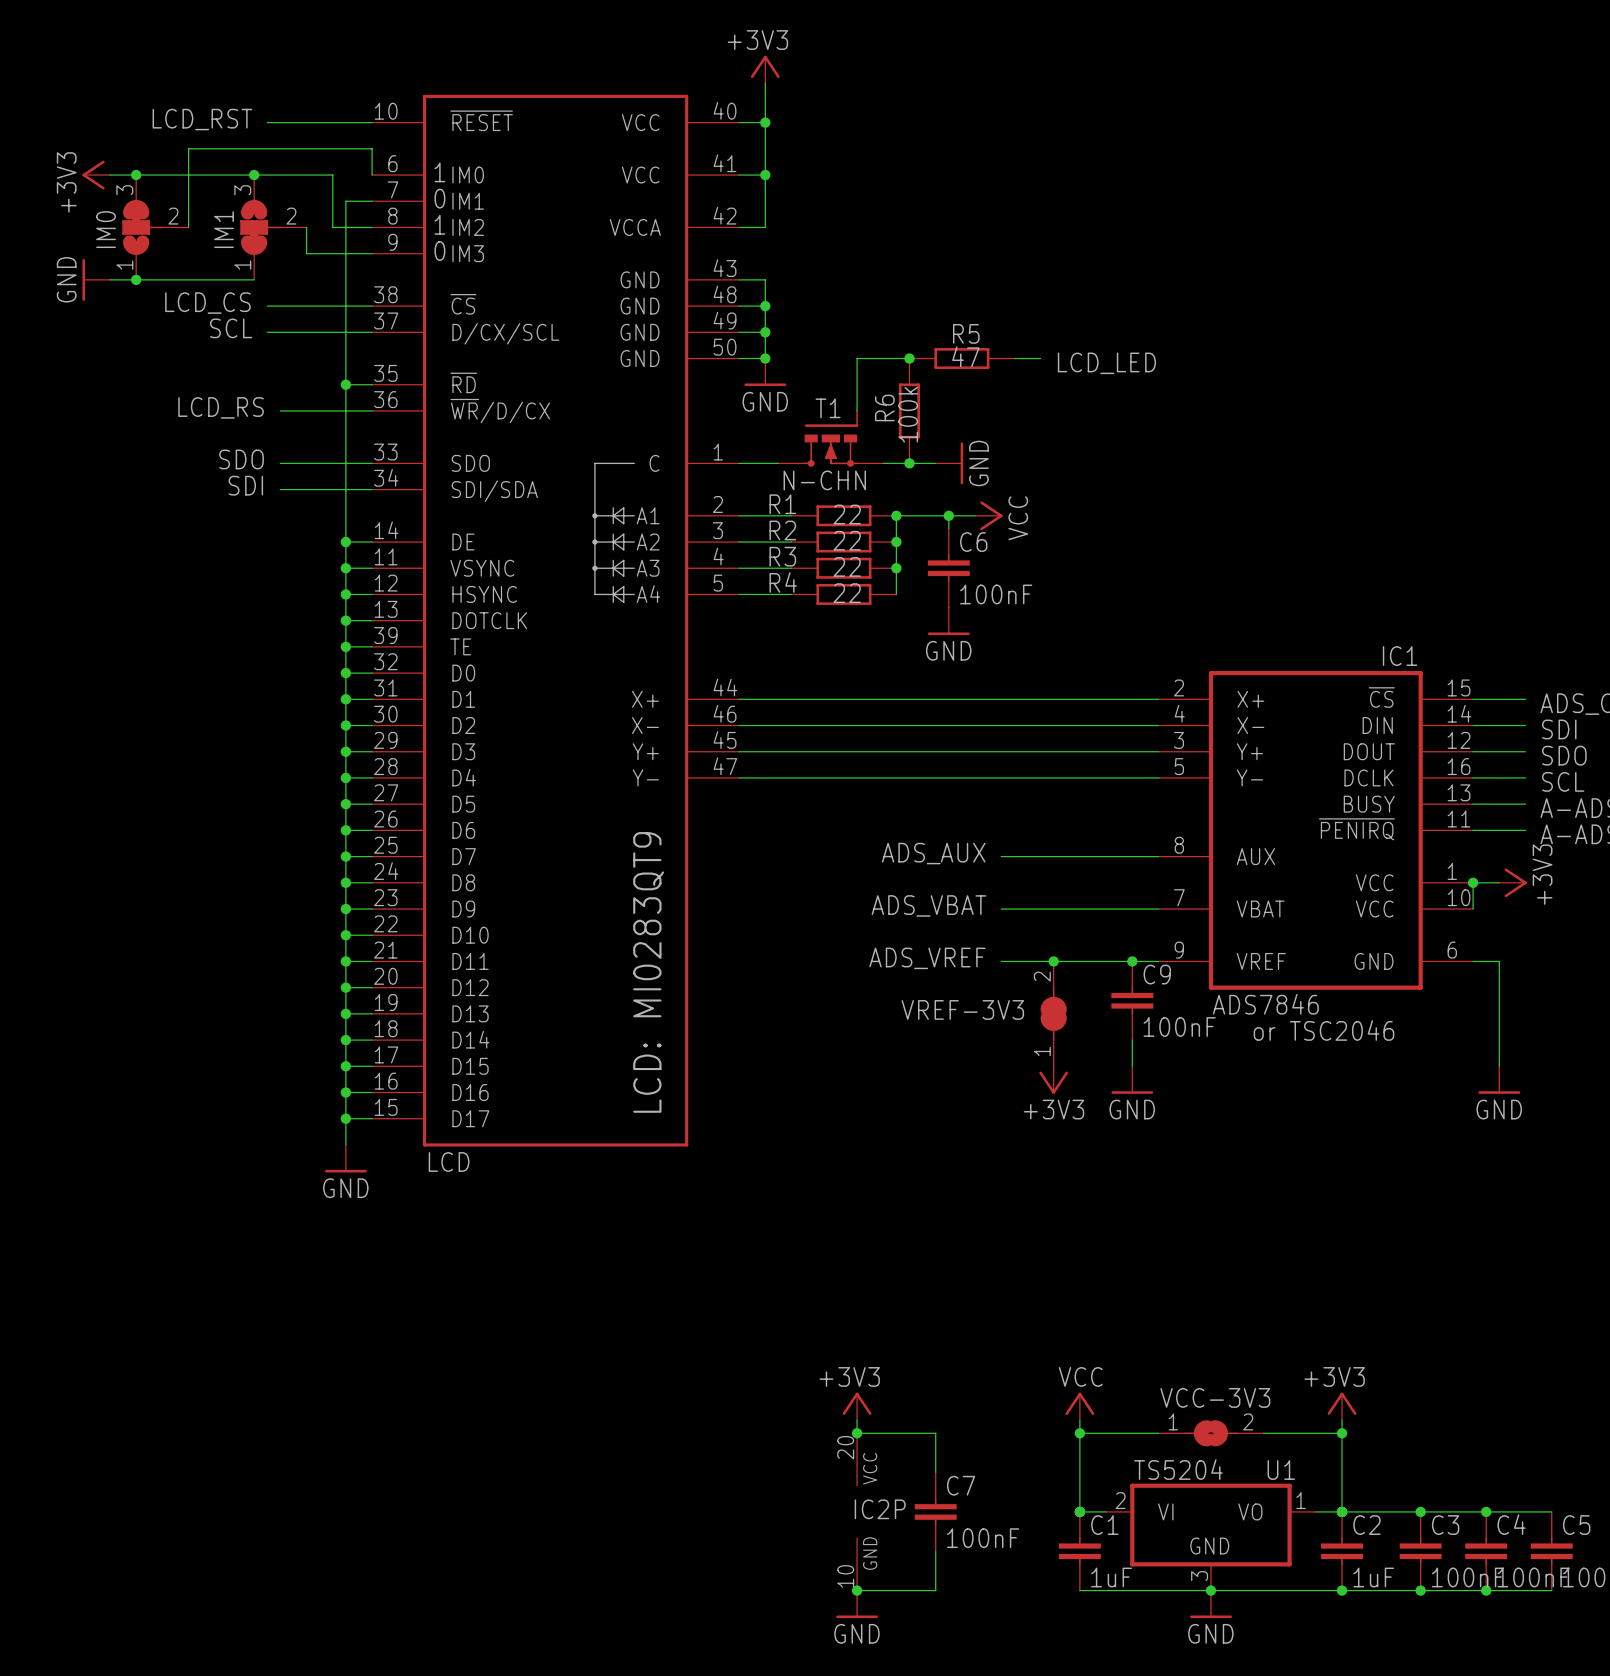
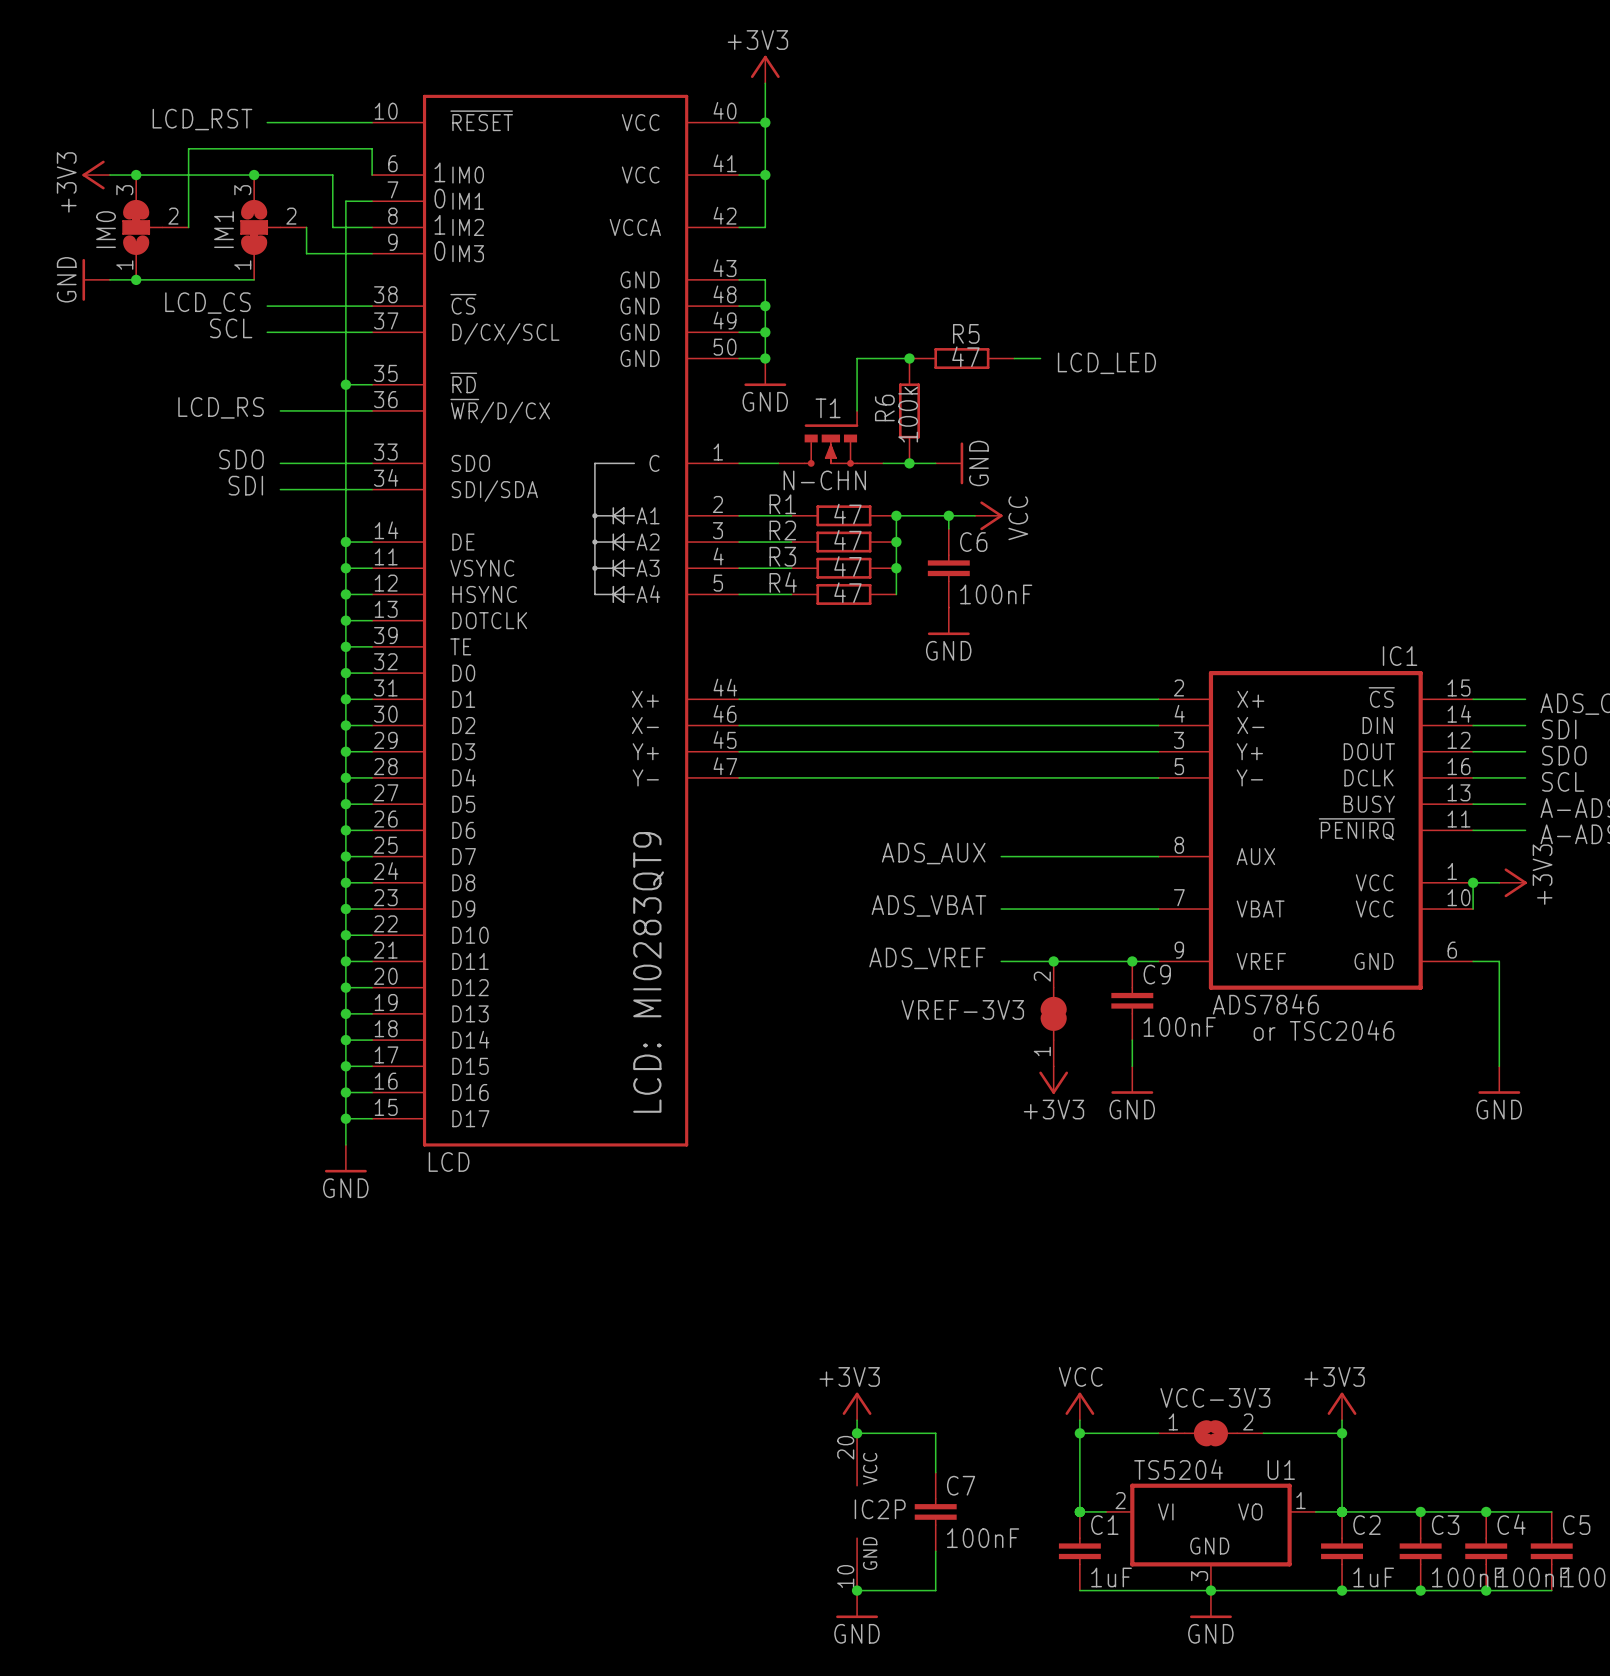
R1 value: 22 (847, 514) -> 47 (847, 514)
R2 value: 22 (847, 540) -> 47 (847, 540)
R3 value: 22 (847, 566) -> 47 (847, 566)
R4 value: 22 (847, 593) -> 47 (847, 592)

